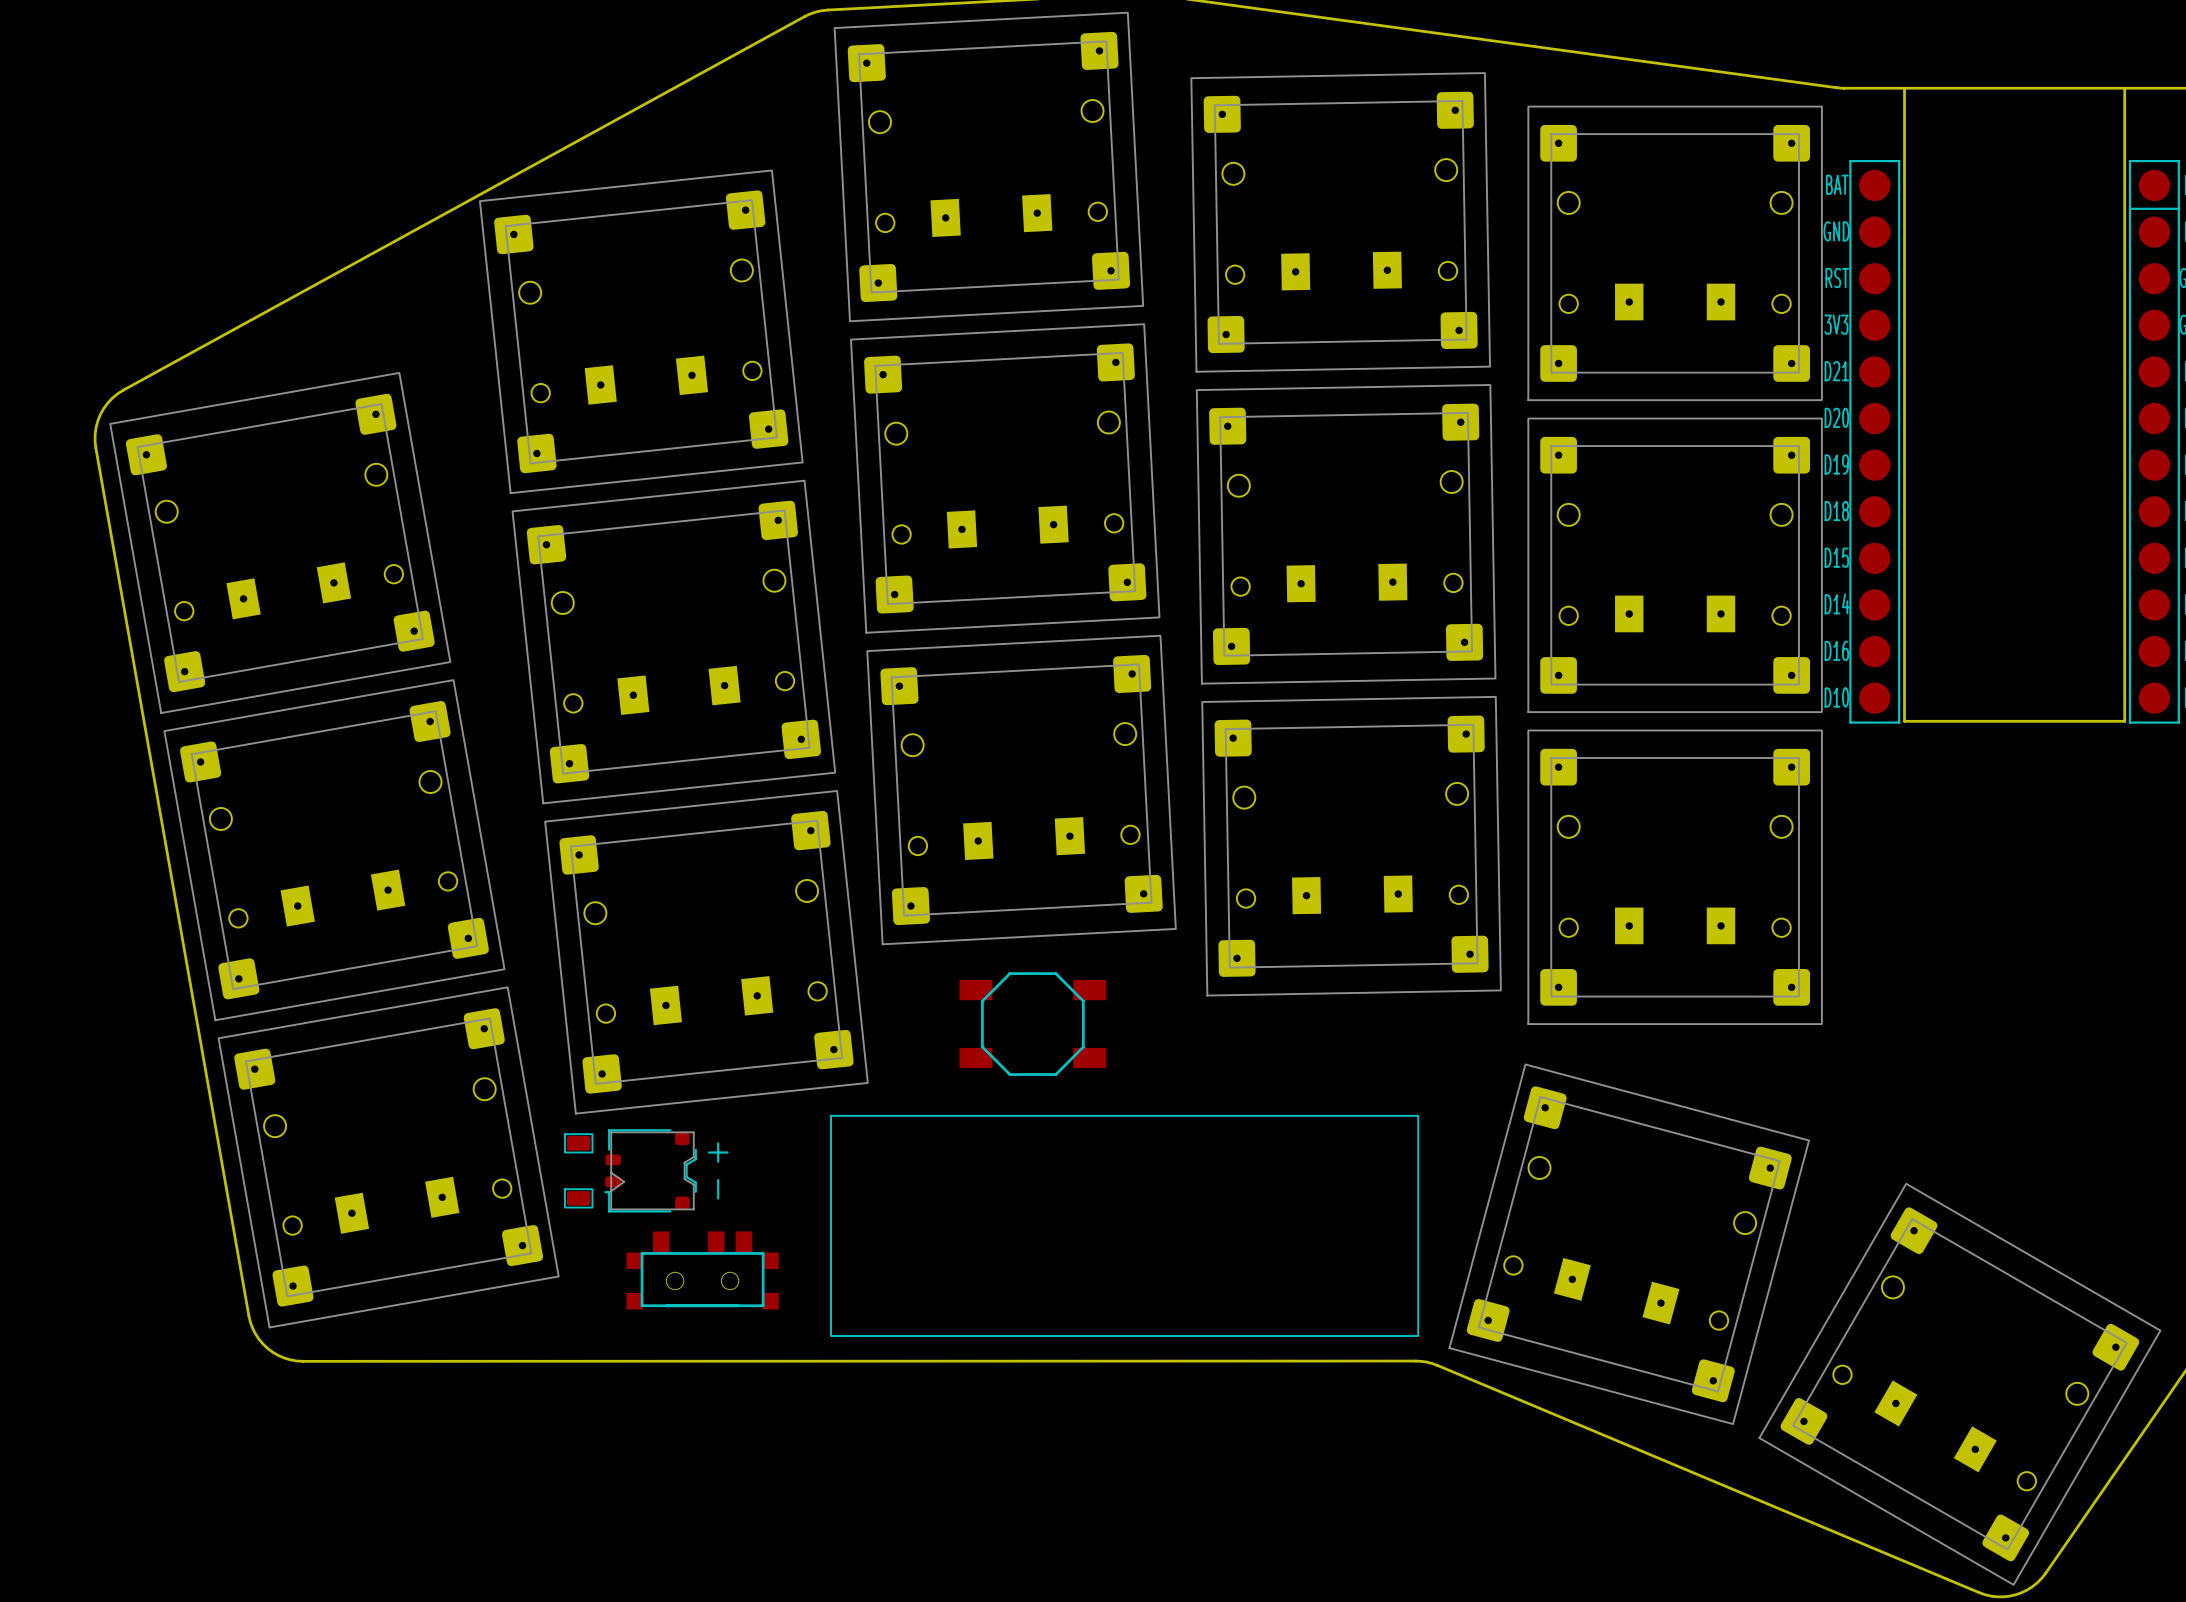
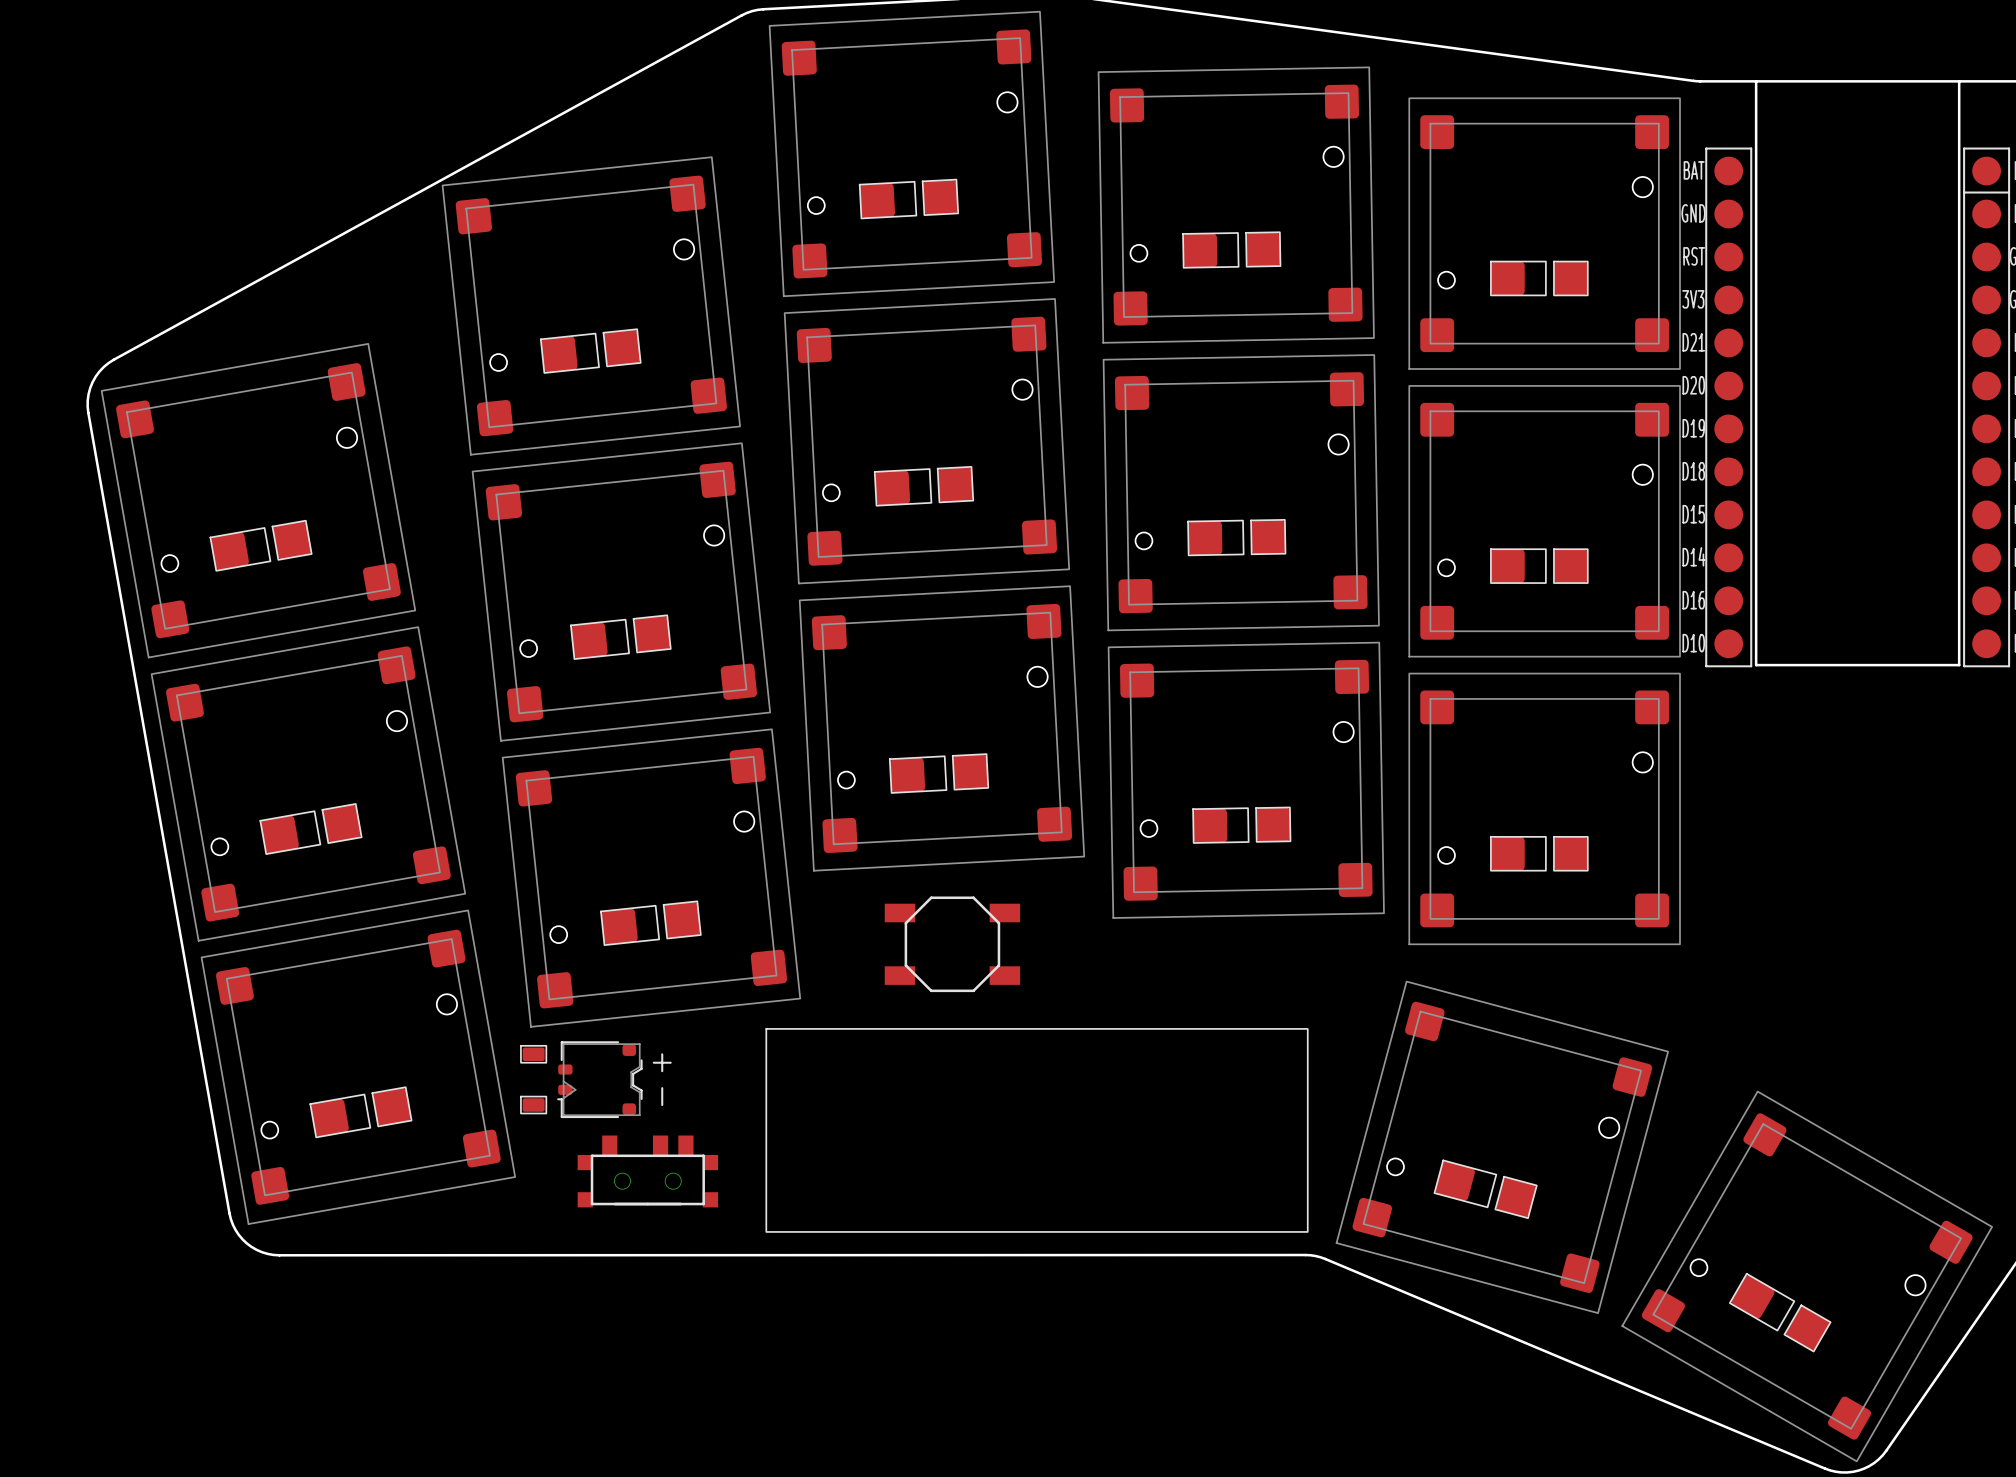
part footprint: [833, 11, 1145, 323] -> [768, 10, 1055, 298]
part footprint: [1190, 72, 1491, 373] -> [1097, 66, 1375, 344]
part footprint: [1527, 105, 1823, 402] -> [1408, 97, 1681, 370]
part footprint: [479, 169, 804, 495] -> [441, 156, 741, 456]
part footprint: [850, 323, 1161, 634] -> [783, 298, 1071, 585]
part footprint: [109, 372, 452, 714] -> [100, 343, 417, 659]
part footprint: [1195, 384, 1497, 685] -> [1102, 354, 1380, 632]
part footprint: [1527, 417, 1823, 714] -> [1408, 385, 1681, 658]
part footprint: [511, 479, 837, 805] -> [471, 442, 772, 742]
part footprint: [866, 634, 1177, 946] -> [798, 585, 1086, 872]
part footprint: [163, 679, 506, 1022] -> [150, 626, 467, 942]
part footprint: [1201, 695, 1502, 997] -> [1107, 641, 1385, 919]
part footprint: [1527, 729, 1823, 1025] -> [1408, 672, 1681, 946]
part footprint: [544, 790, 869, 1115] -> [501, 728, 802, 1028]
part footprint: [217, 986, 560, 1329] -> [200, 909, 517, 1225]
part footprint: [1448, 1063, 1810, 1425] -> [1335, 980, 1669, 1314]
part footprint: [1758, 1182, 2162, 1586] -> [1621, 1090, 1993, 1463]

